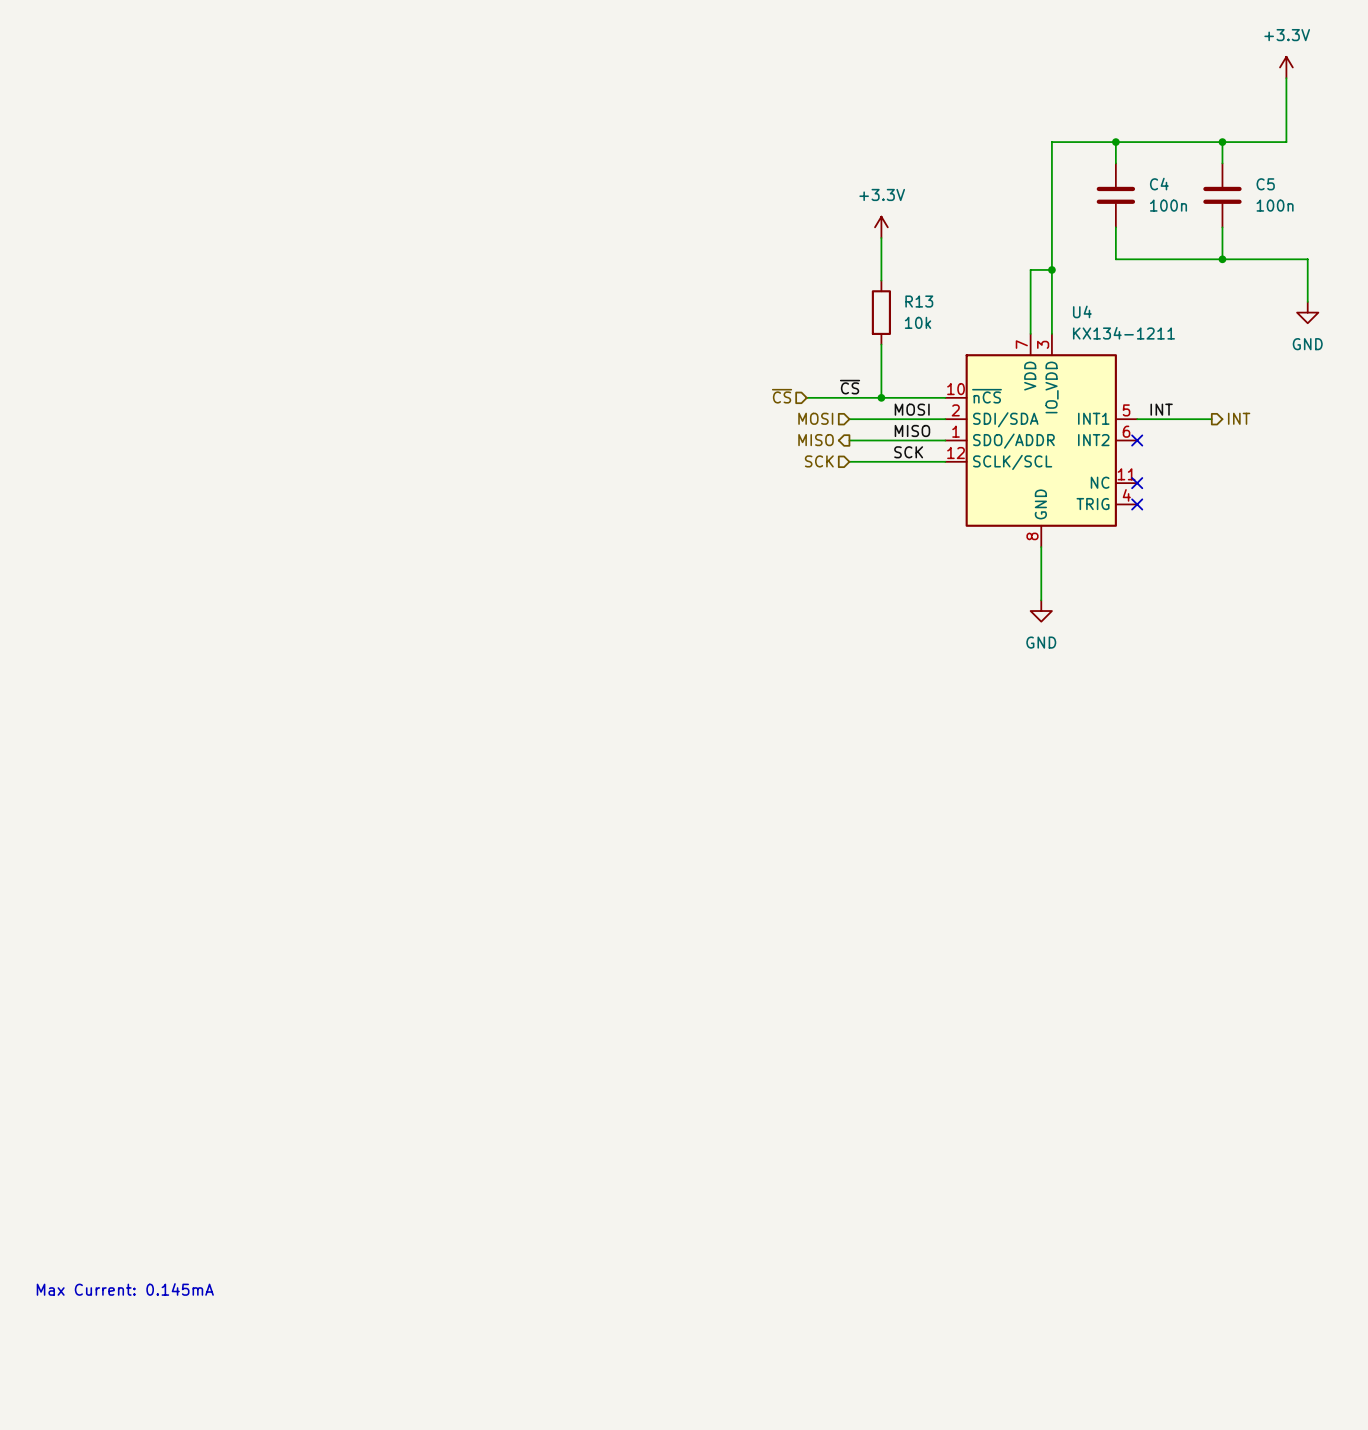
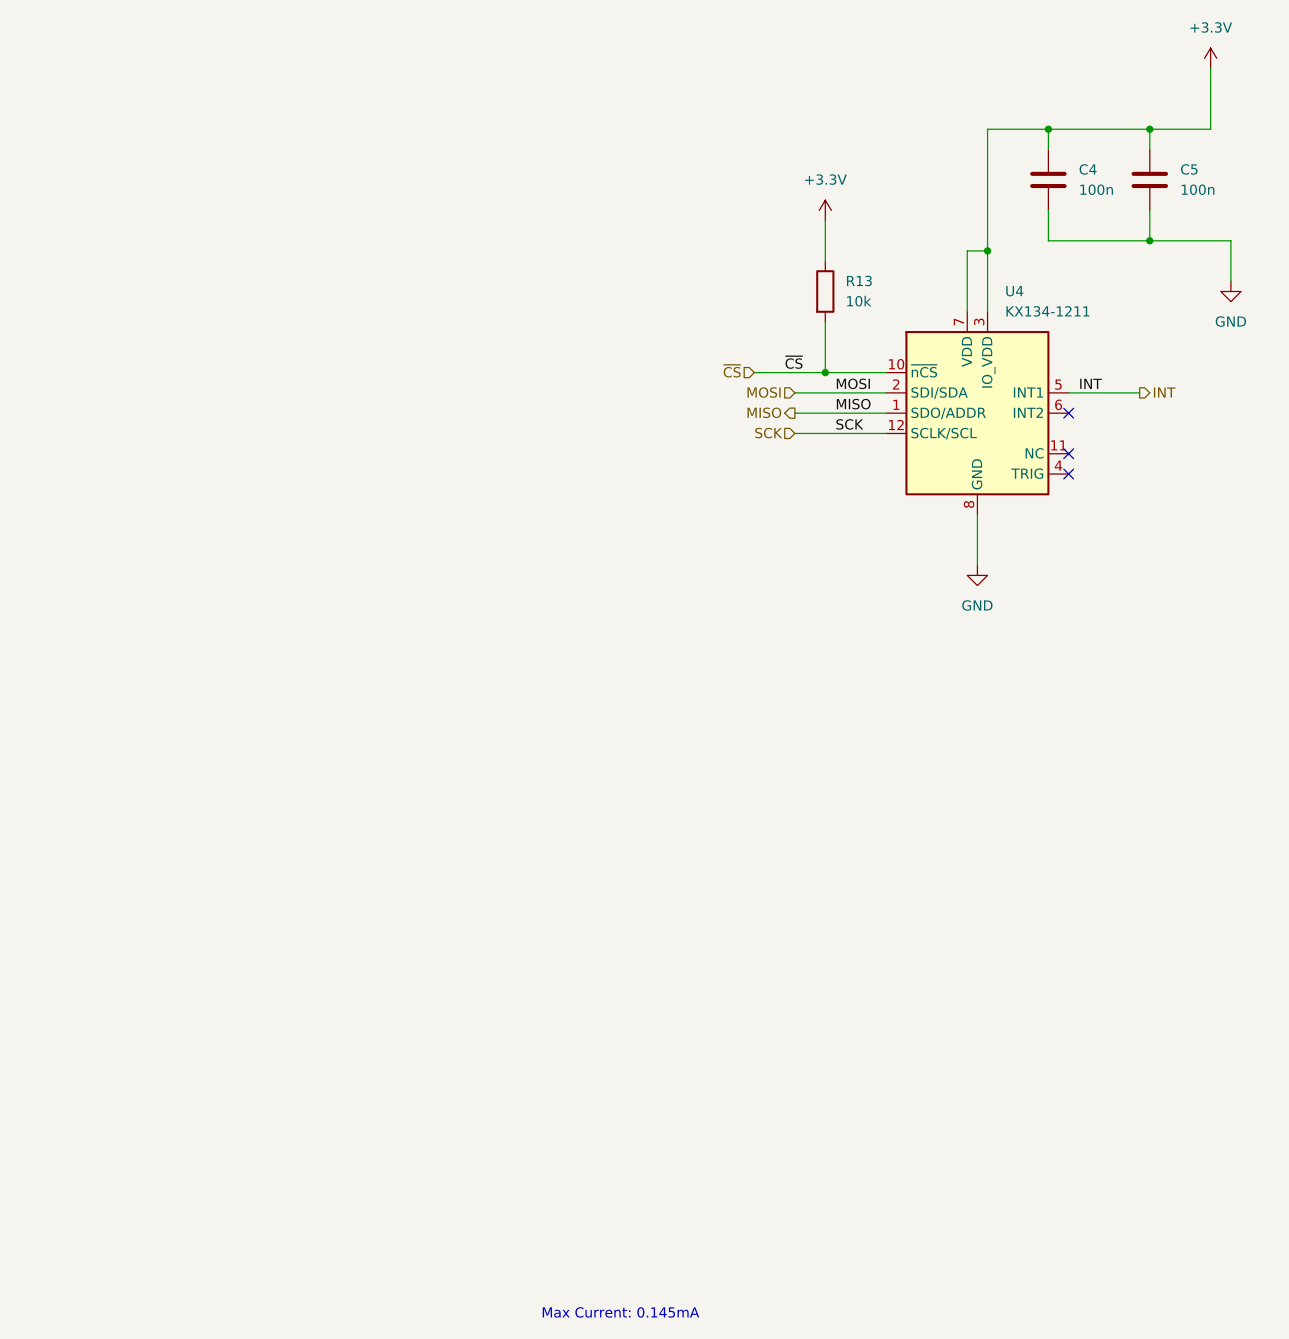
text: Max Current: 0.145mA (125, 1289) -> none
text: none -> Max Current: 0.145mA (620, 1312)

